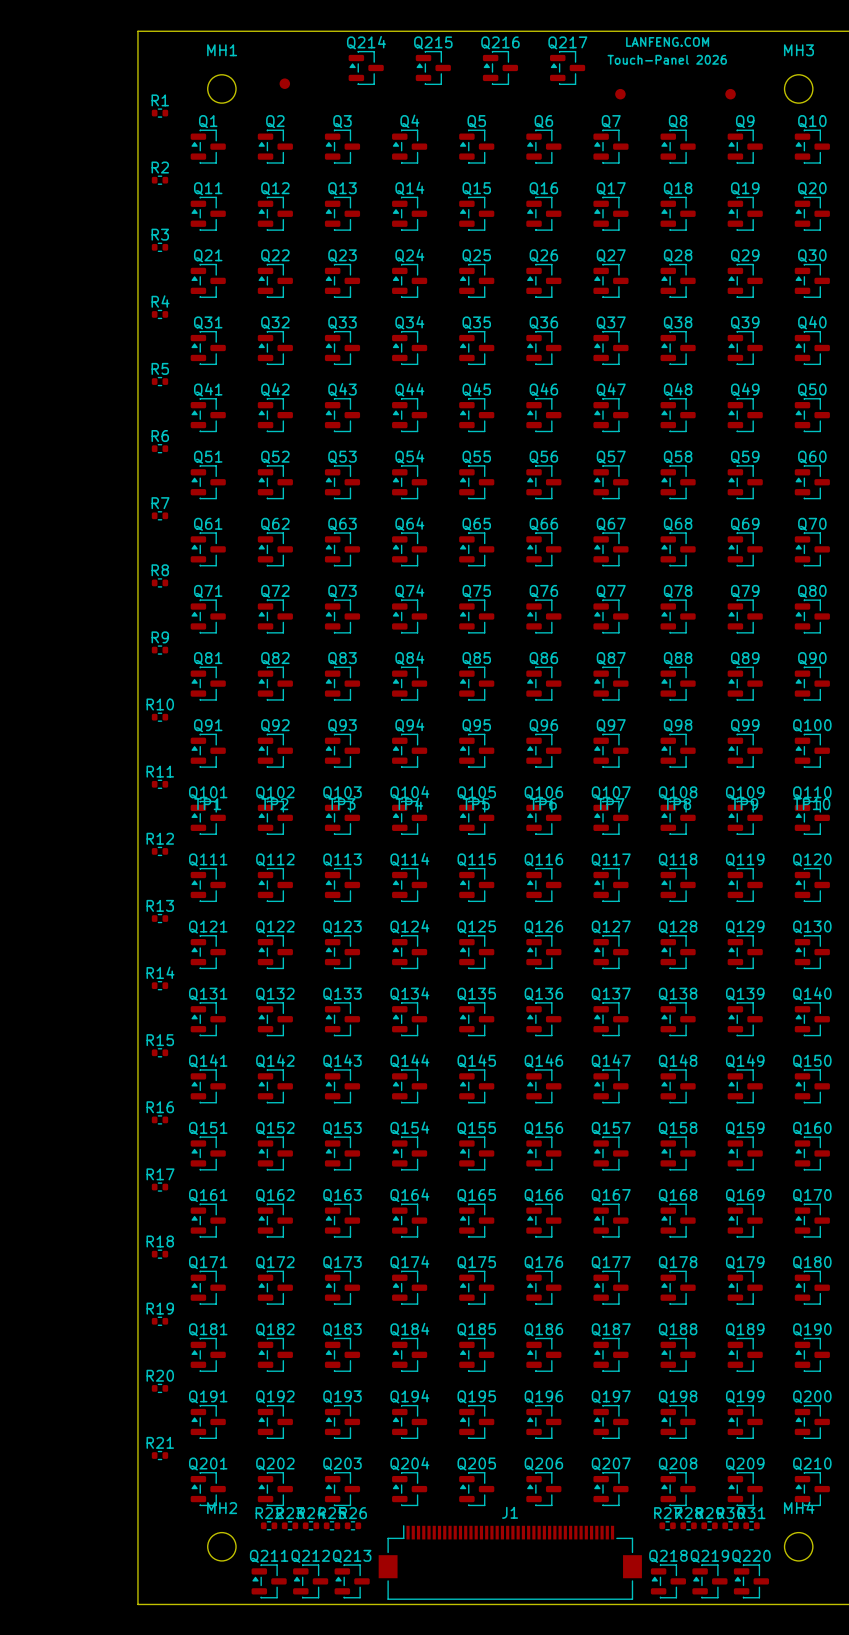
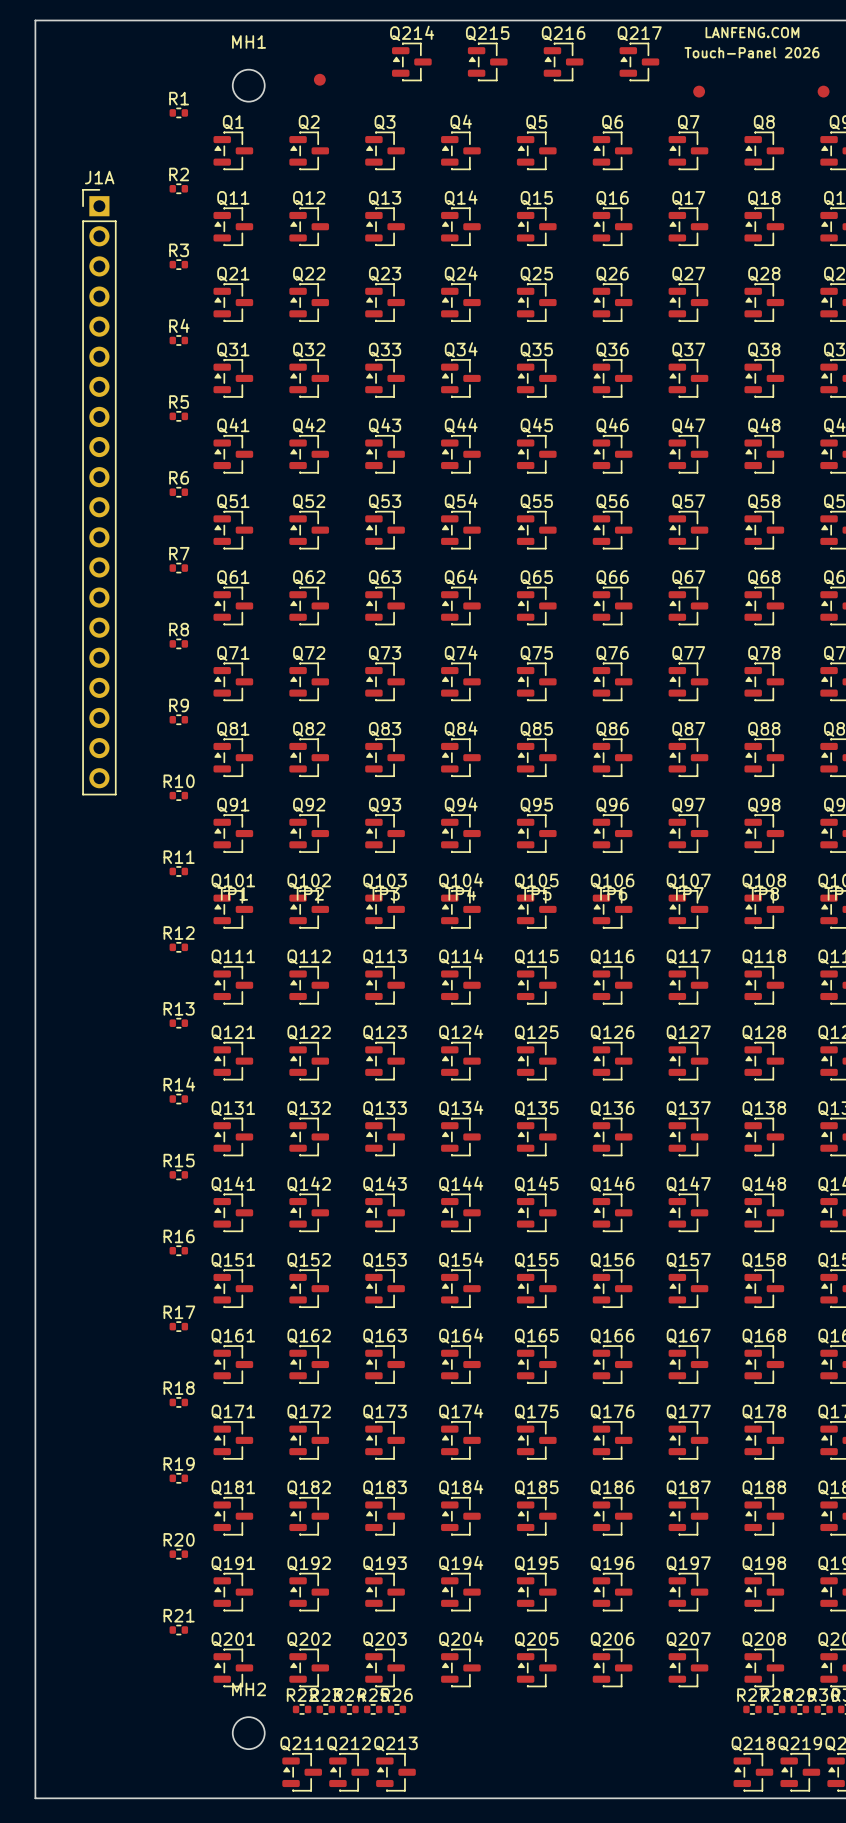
board edge: (137, 31) (137, 1604) -> (153, 20) (35, 20) (35, 1798) (153, 1798)
J1A: none -> (99, 492)
J1: (510, 1562) -> none

